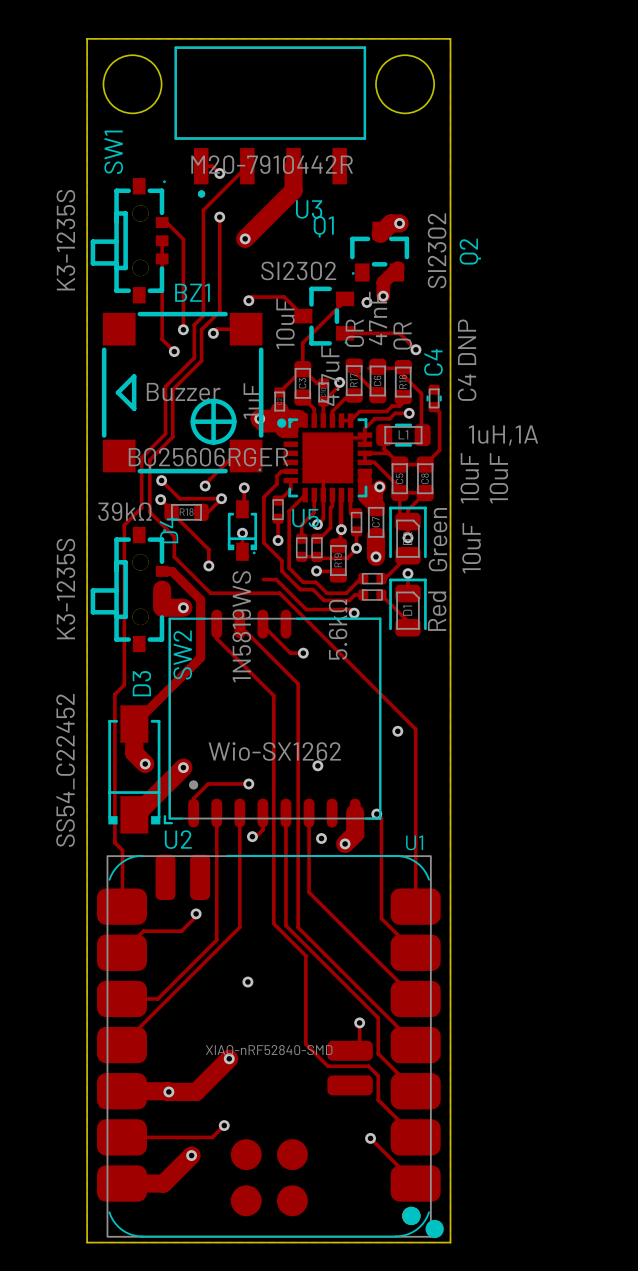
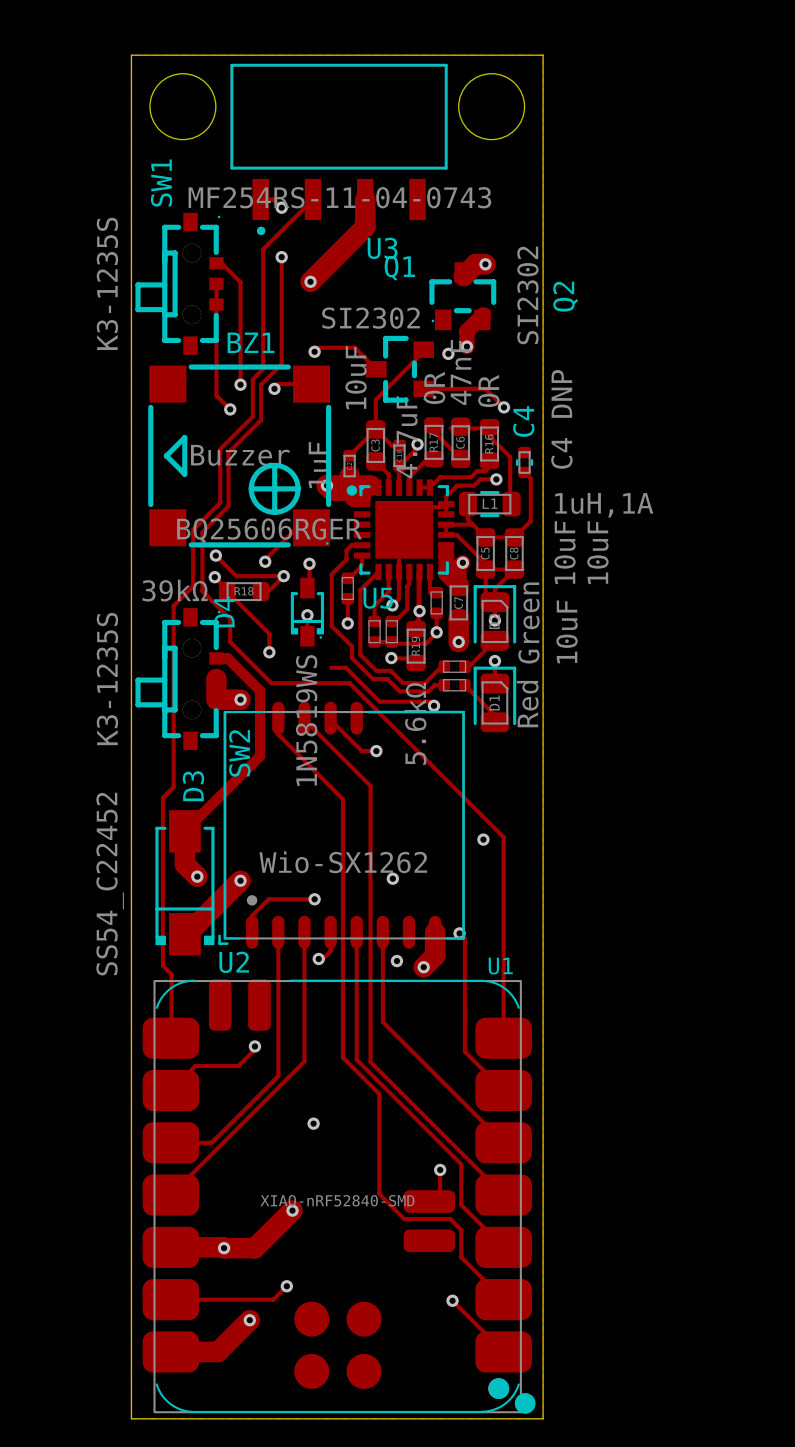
U3 value: M20-7910442R (272, 164) -> MF254RS-11-04-0743 (339, 197)

